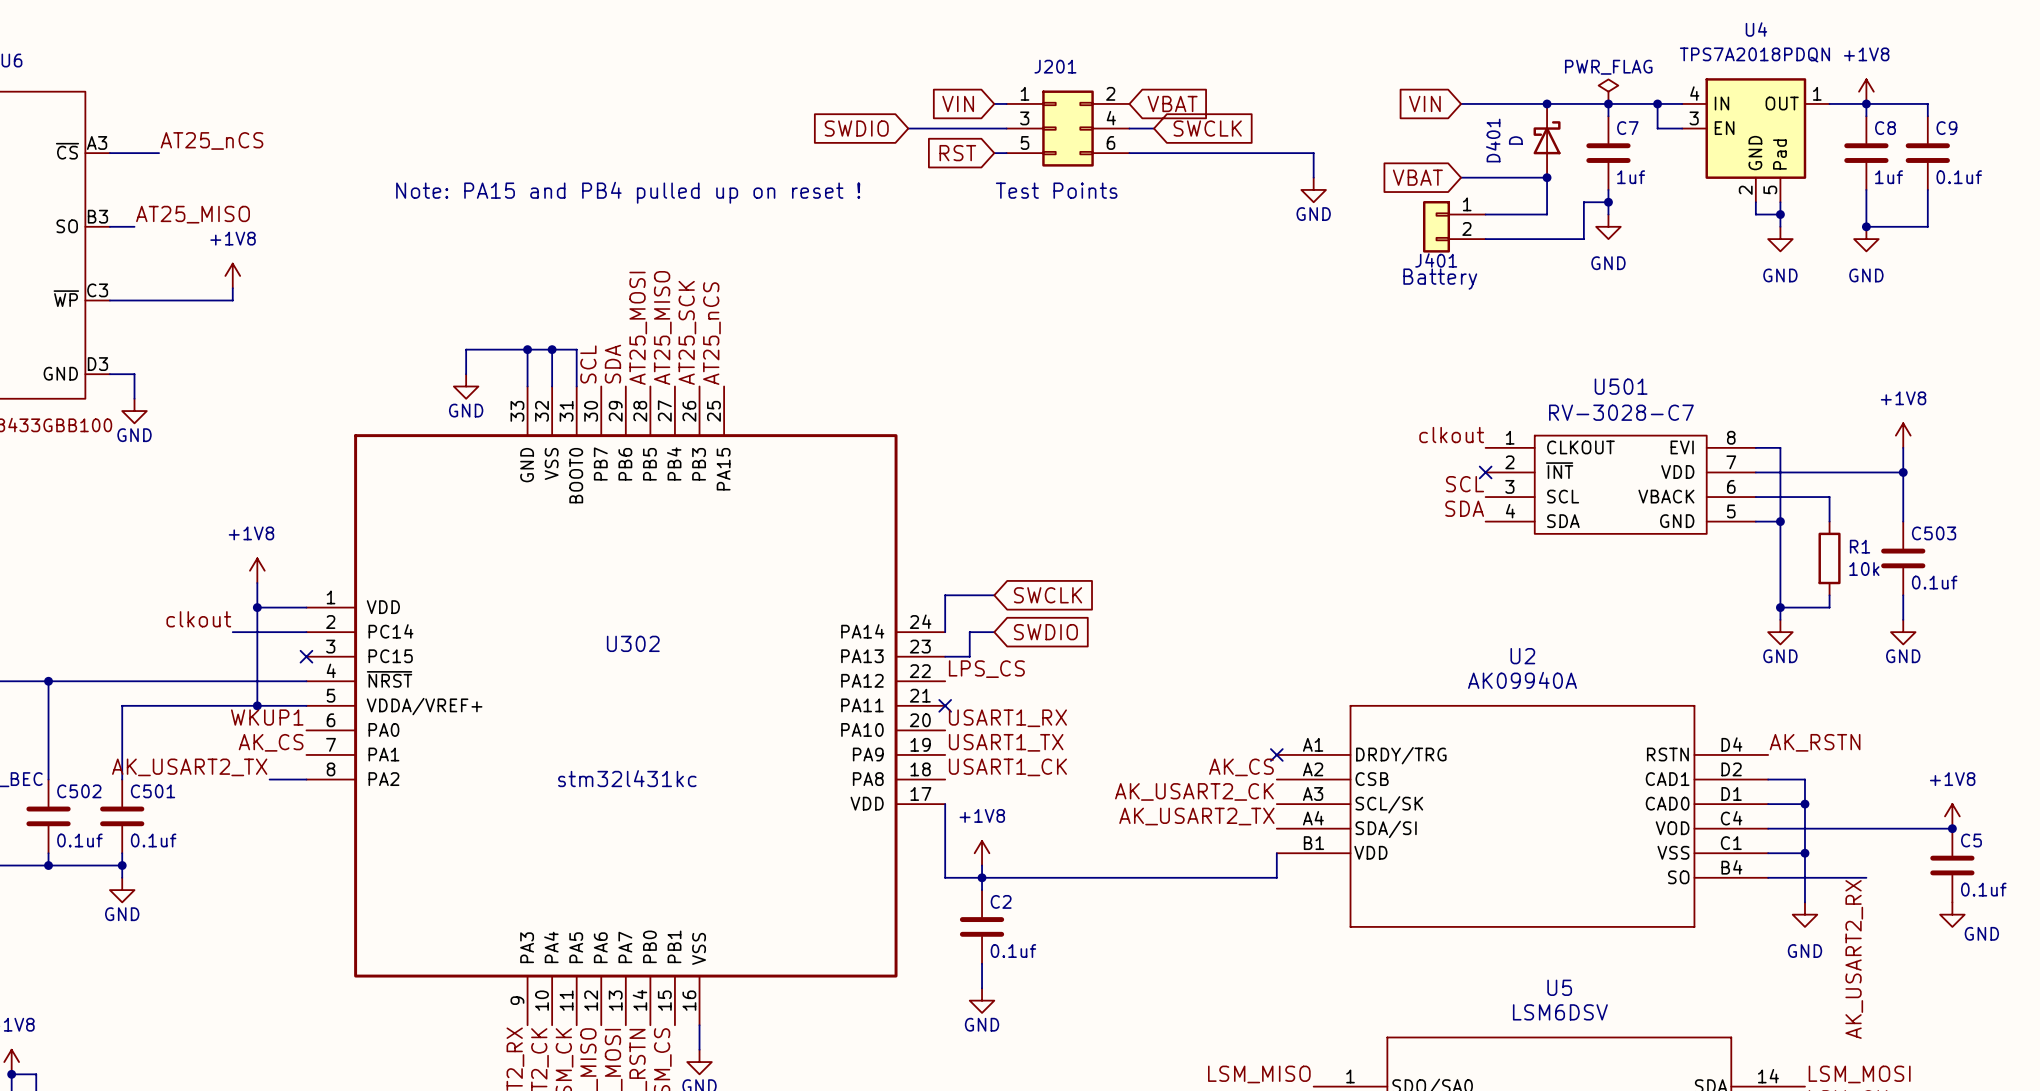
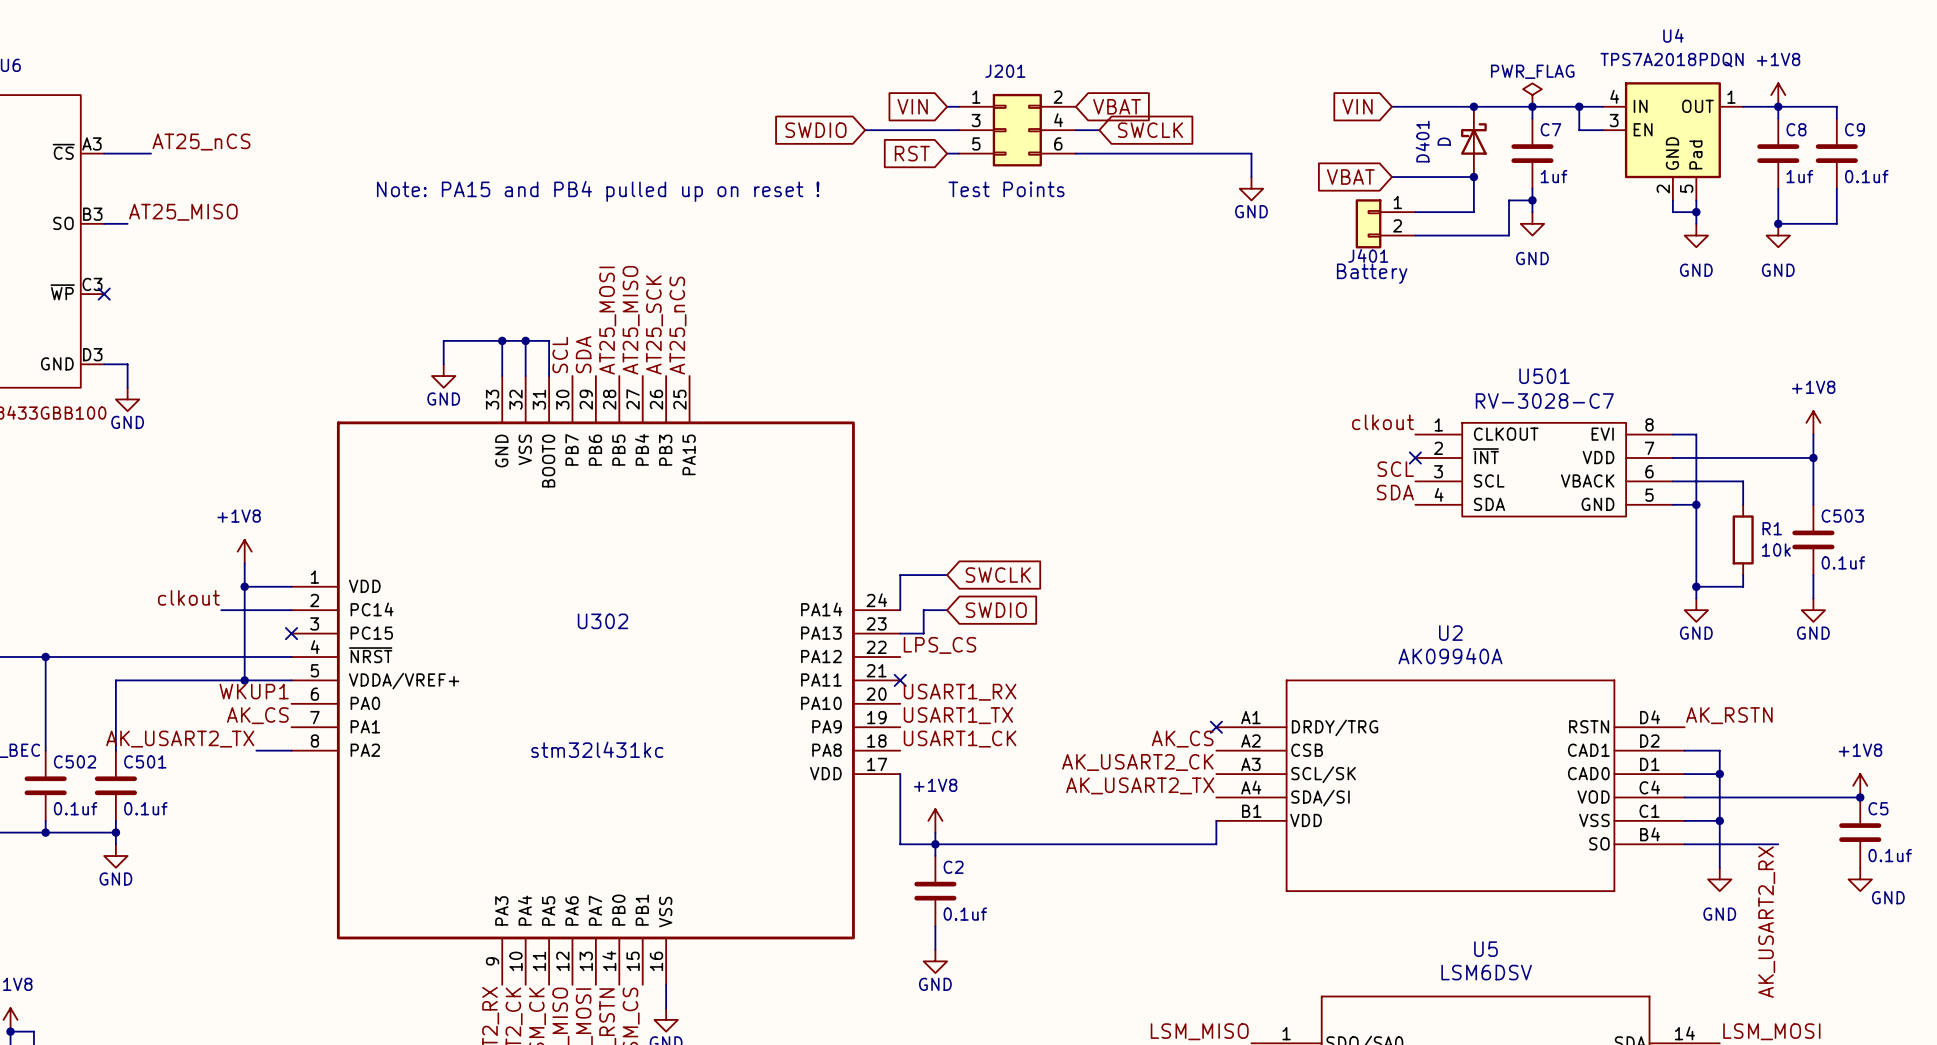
power symbol: +1V8 (232, 275) -> none
wire: (232, 288) (232, 300) (109, 300) -> none
no-connect mark: none -> (104, 294)

